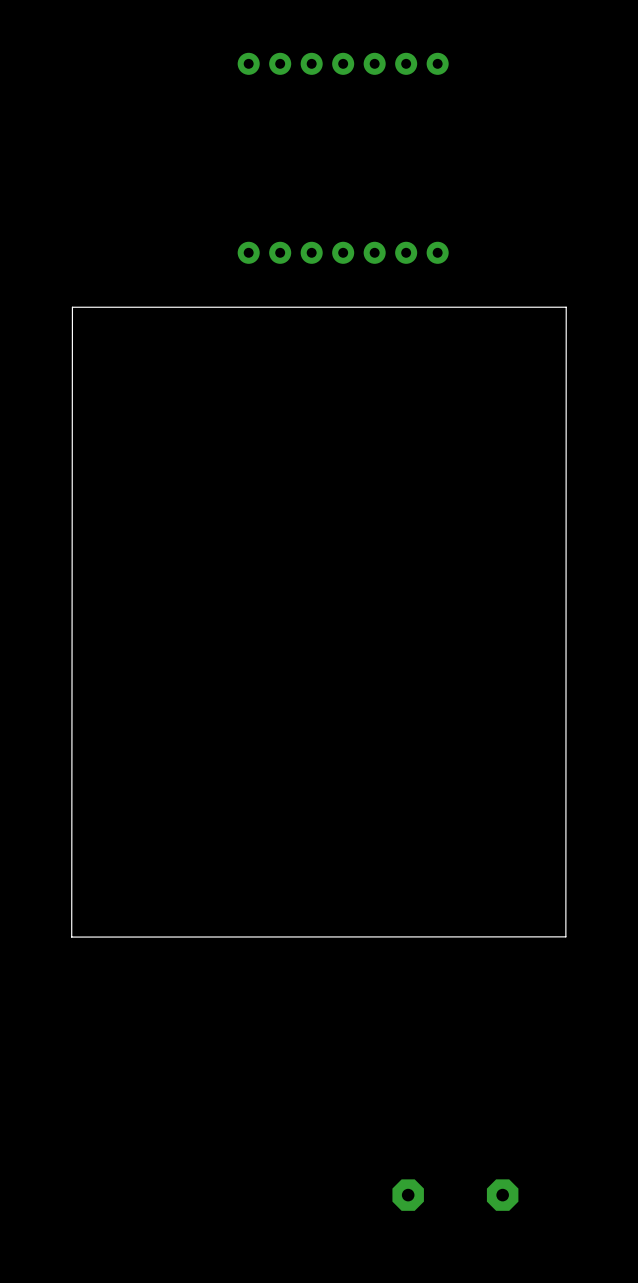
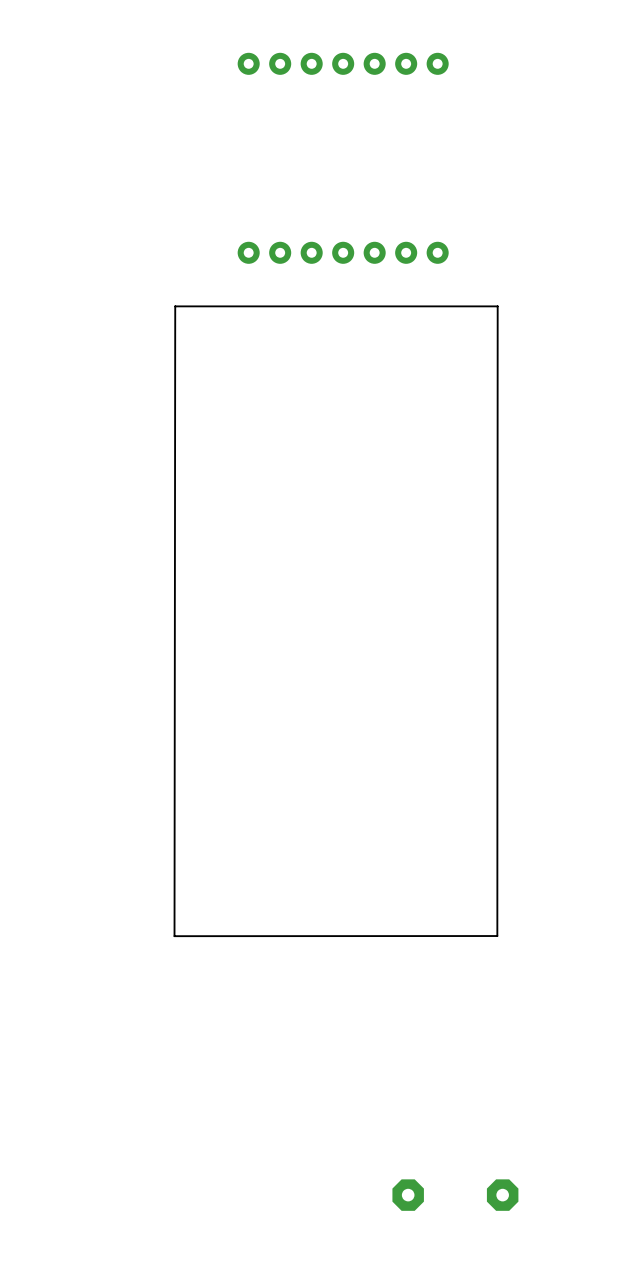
board edge: (566, 307) (72, 307) (71, 937) (565, 936) (566, 307) -> (497, 306) (497, 936) (174, 936) (175, 306) (497, 306)

